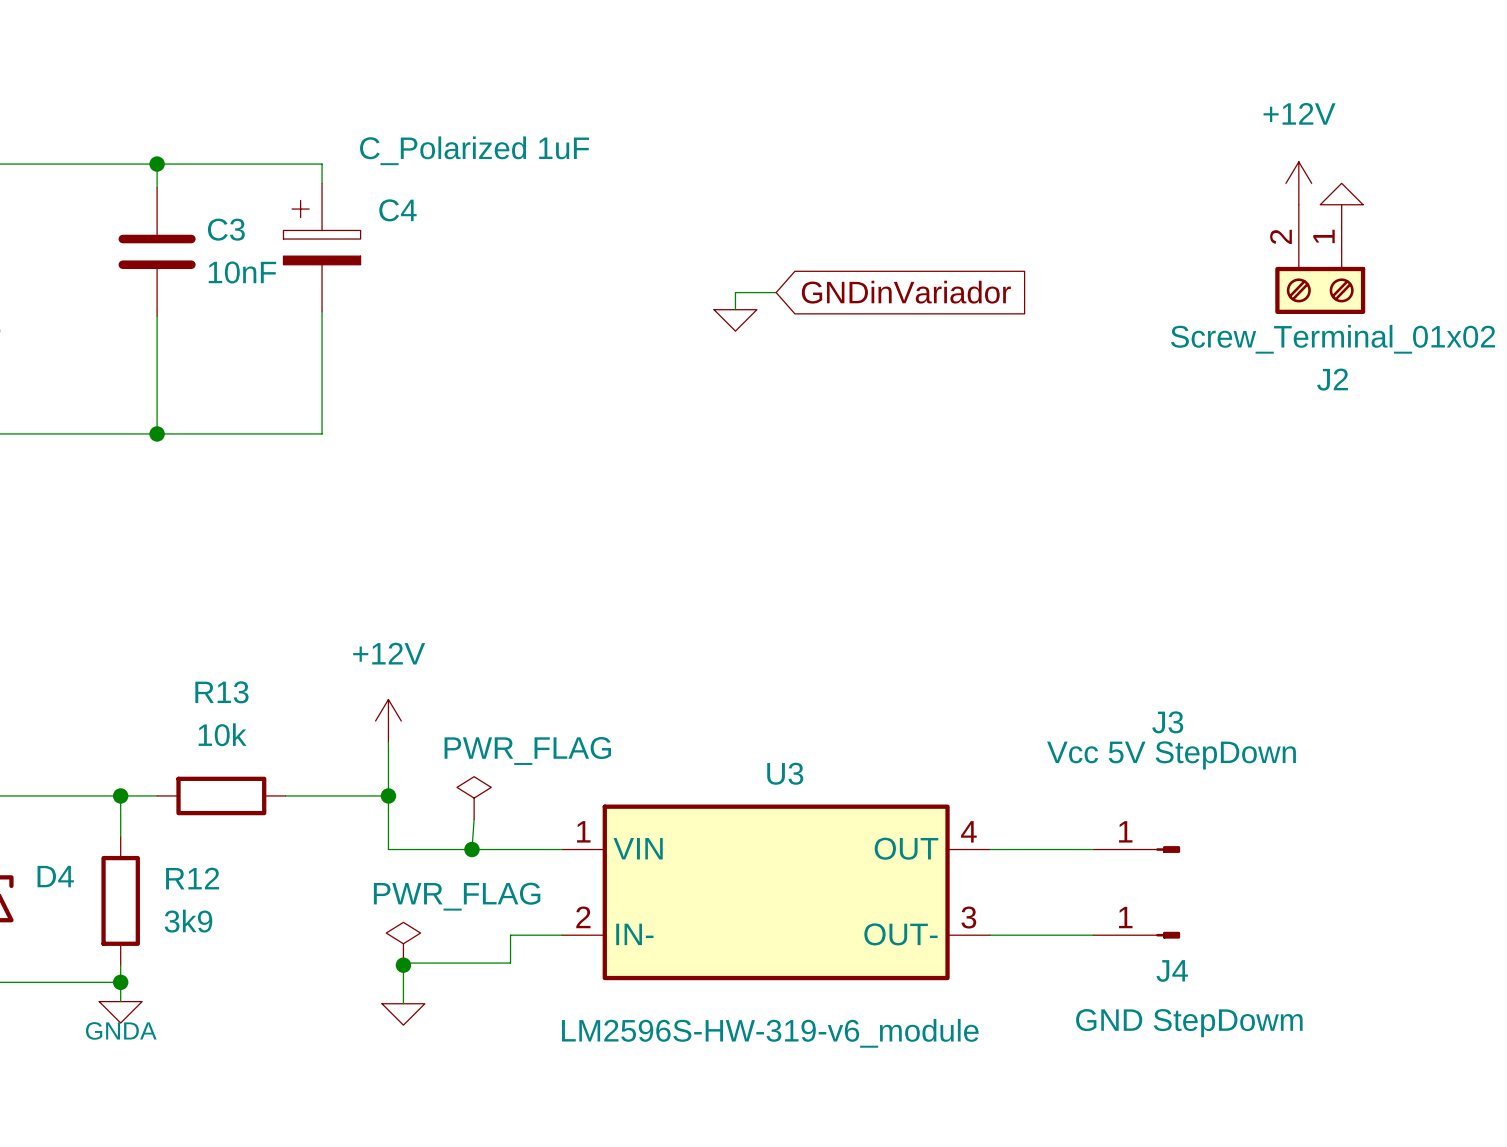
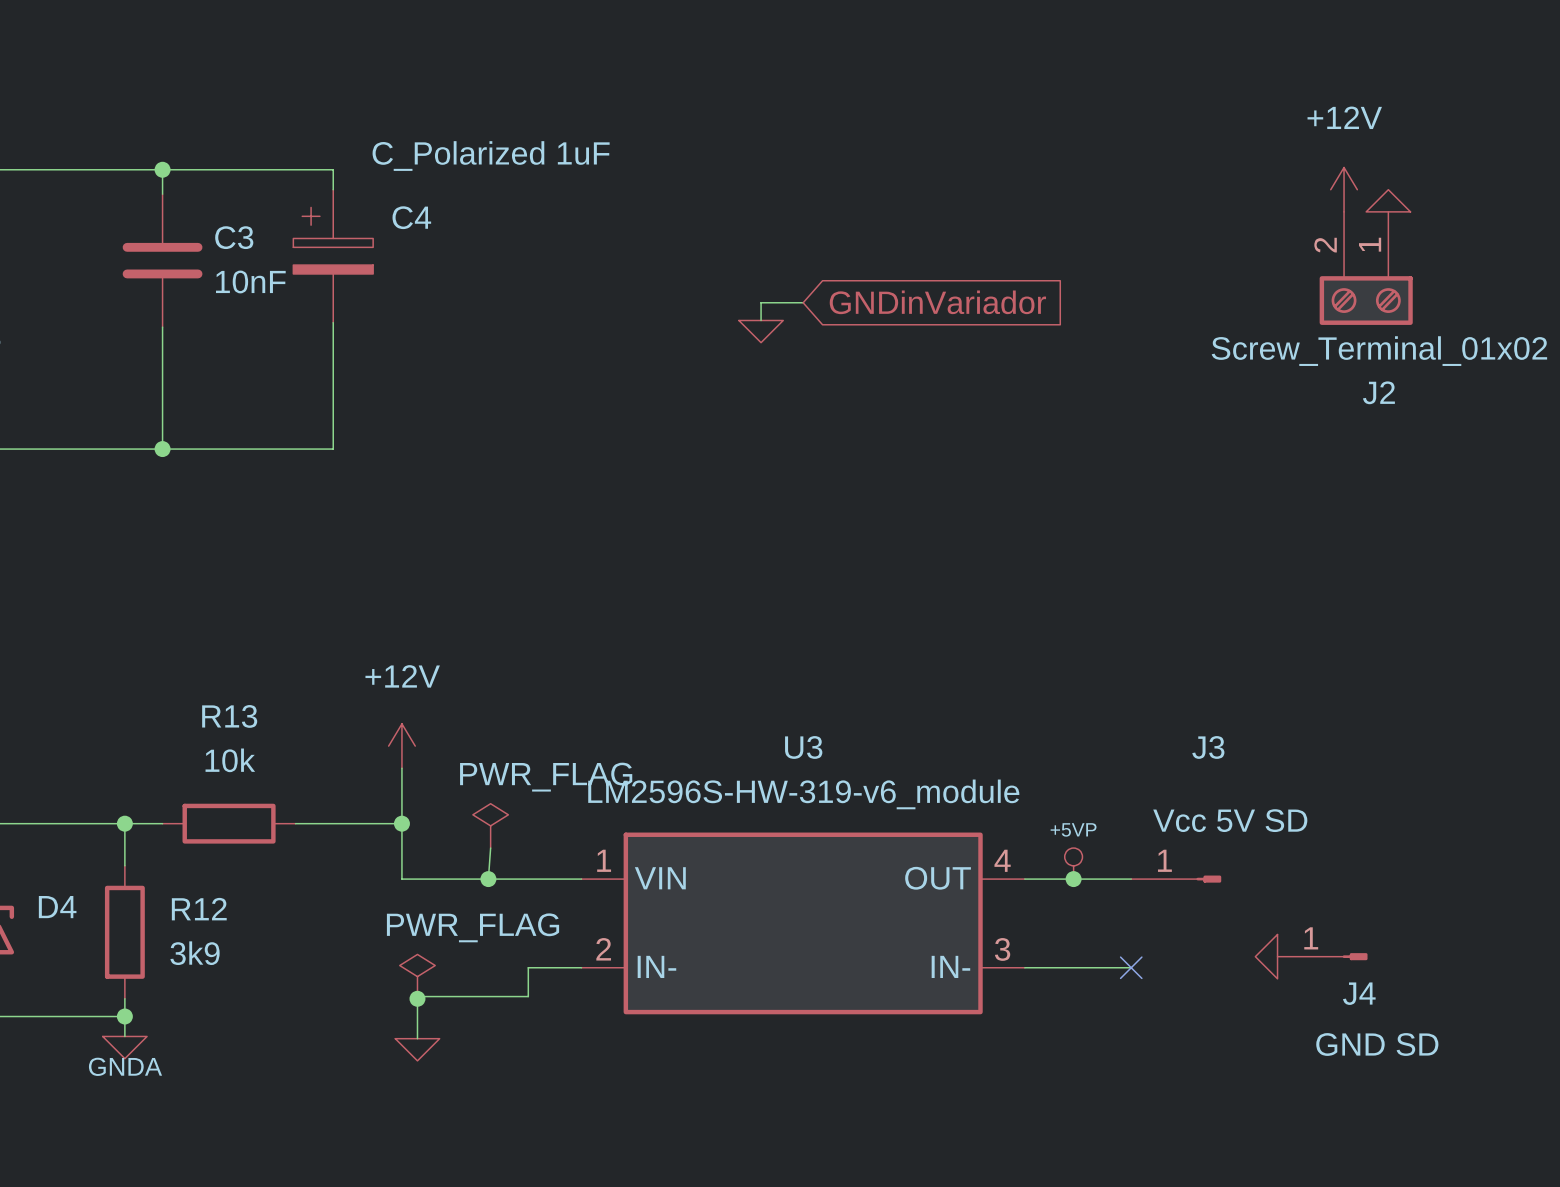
J3 value: Vcc 5V StepDown (1171, 755) -> Vcc 5V SD (1230, 820)
U3 name position: U3 (785, 773) -> U3 (803, 747)
power symbol: none -> +5VP (1073, 863)
junction: none -> (1073, 879)
power symbol: none -> (1266, 956)
U3 pin name: OUT- (900, 934) -> IN- (950, 966)
no-connect mark: none -> (1131, 967)
J4 position: (1136, 935) -> (1322, 956)
J4 value: GND StepDowm (1189, 1023) -> GND SD (1377, 1044)
U3 value position: LM2596S-HW-319-v6_module (770, 1033) -> LM2596S-HW-319-v6_module (803, 794)

